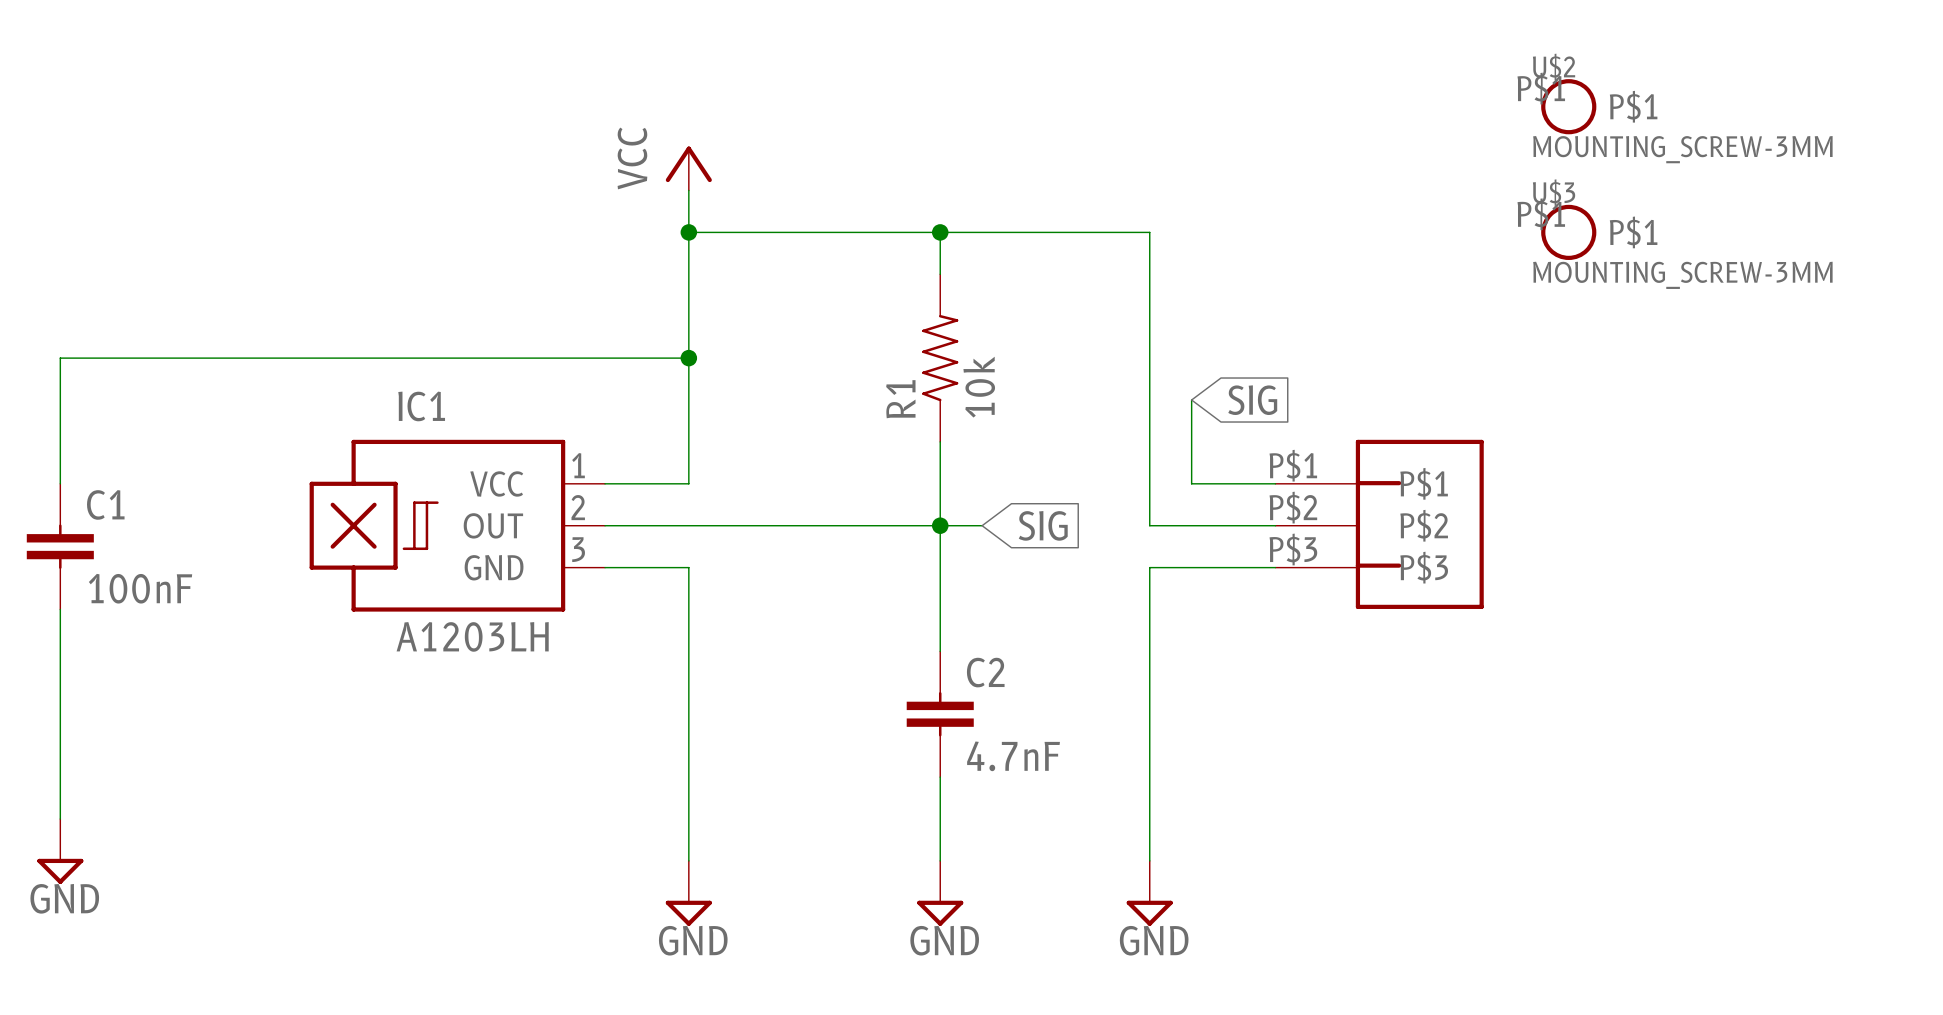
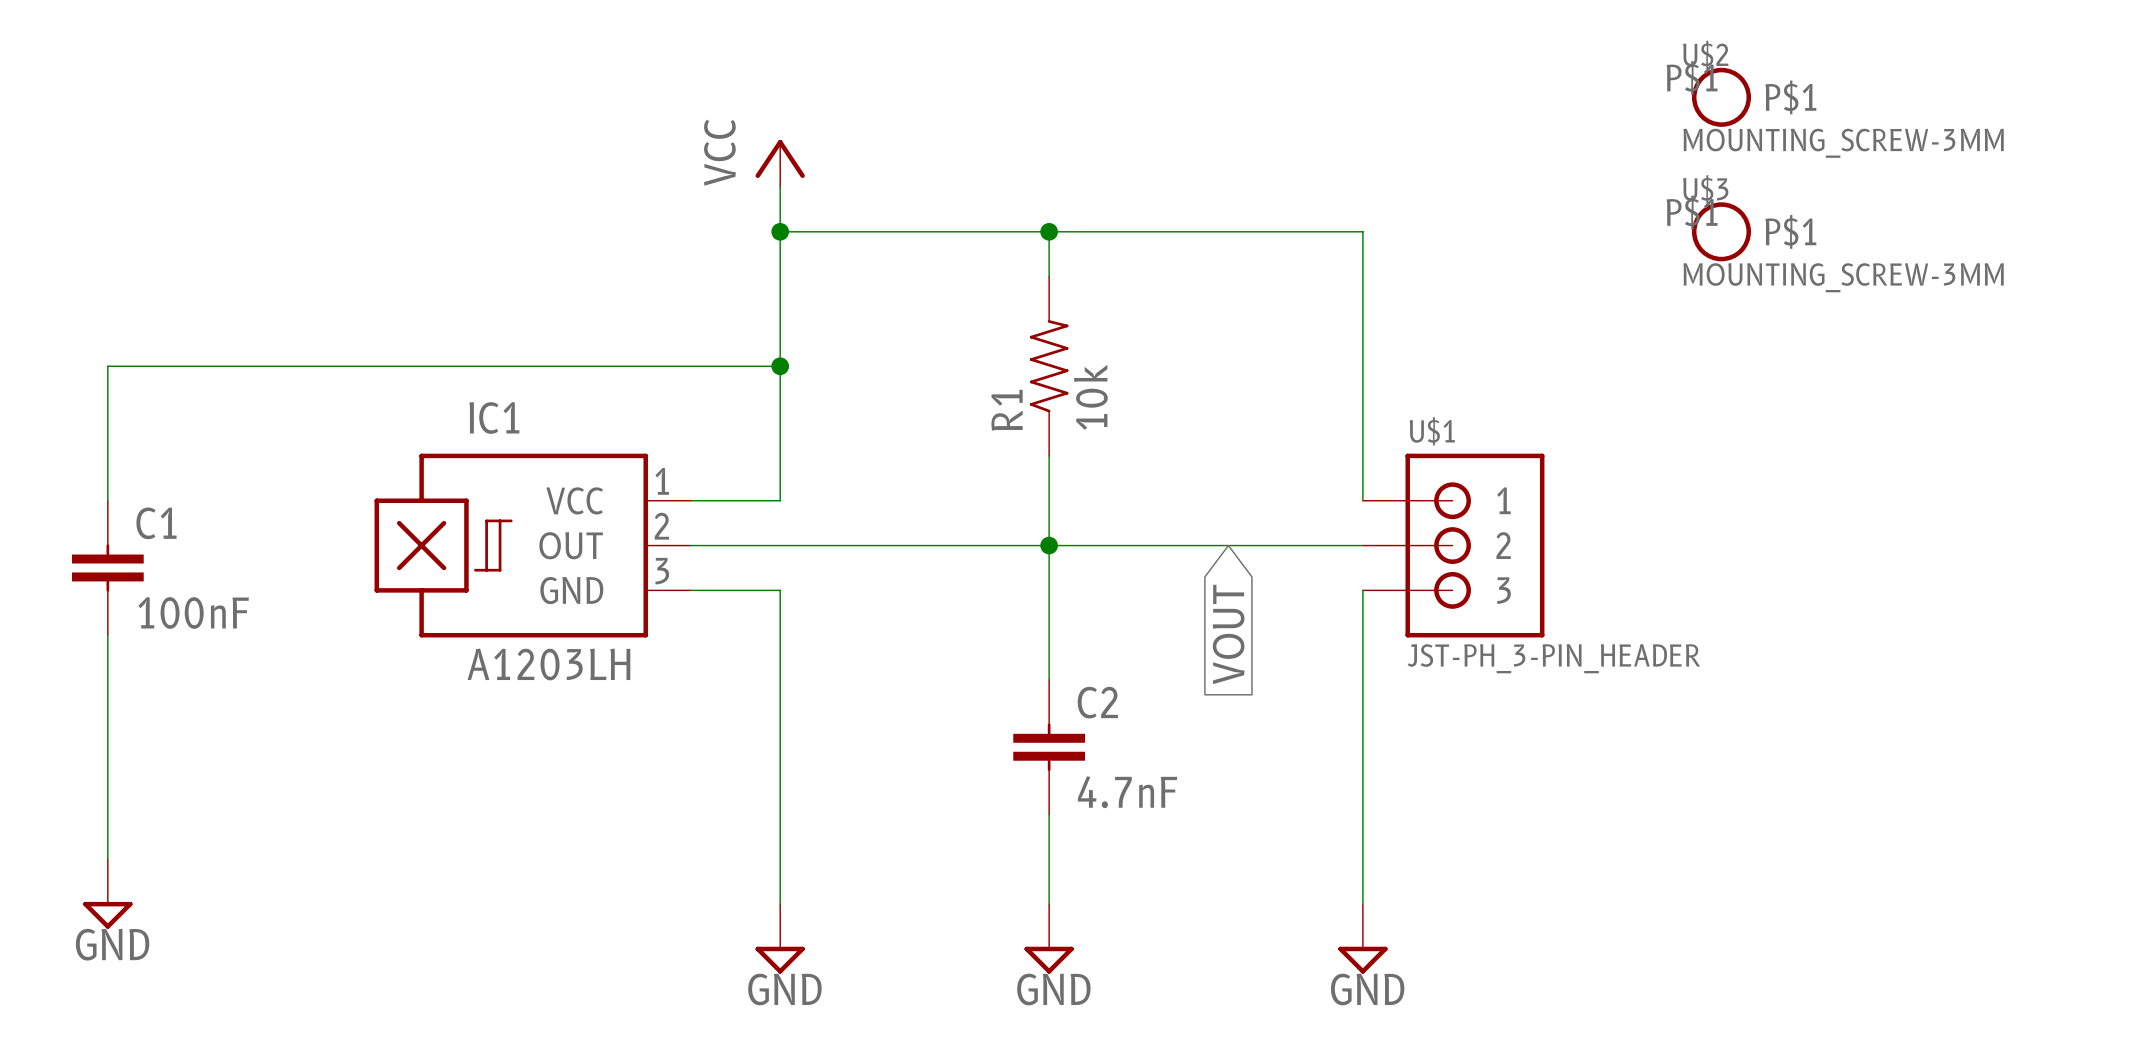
wire: (1149, 232) (1149, 525) -> (1273, 231) (1362, 231) (1362, 500)
wire: (1191, 400) (1191, 483) (1275, 483) -> none
global label: SIG (1252, 400) -> none
part: (1379, 524) -> none
wire: none -> (1093, 545) (1273, 545)
global label: SIG (1043, 525) -> none
U$1: none -> JST-PH_3-PIN_HEADER (1453, 545)
wire: none -> (1362, 590) (1362, 904)
wire: (1275, 567) (1149, 567) (1149, 860) -> none
global label: none -> VOUT (1228, 634)
power symbol position: GND (1149, 893) -> GND (1362, 938)

